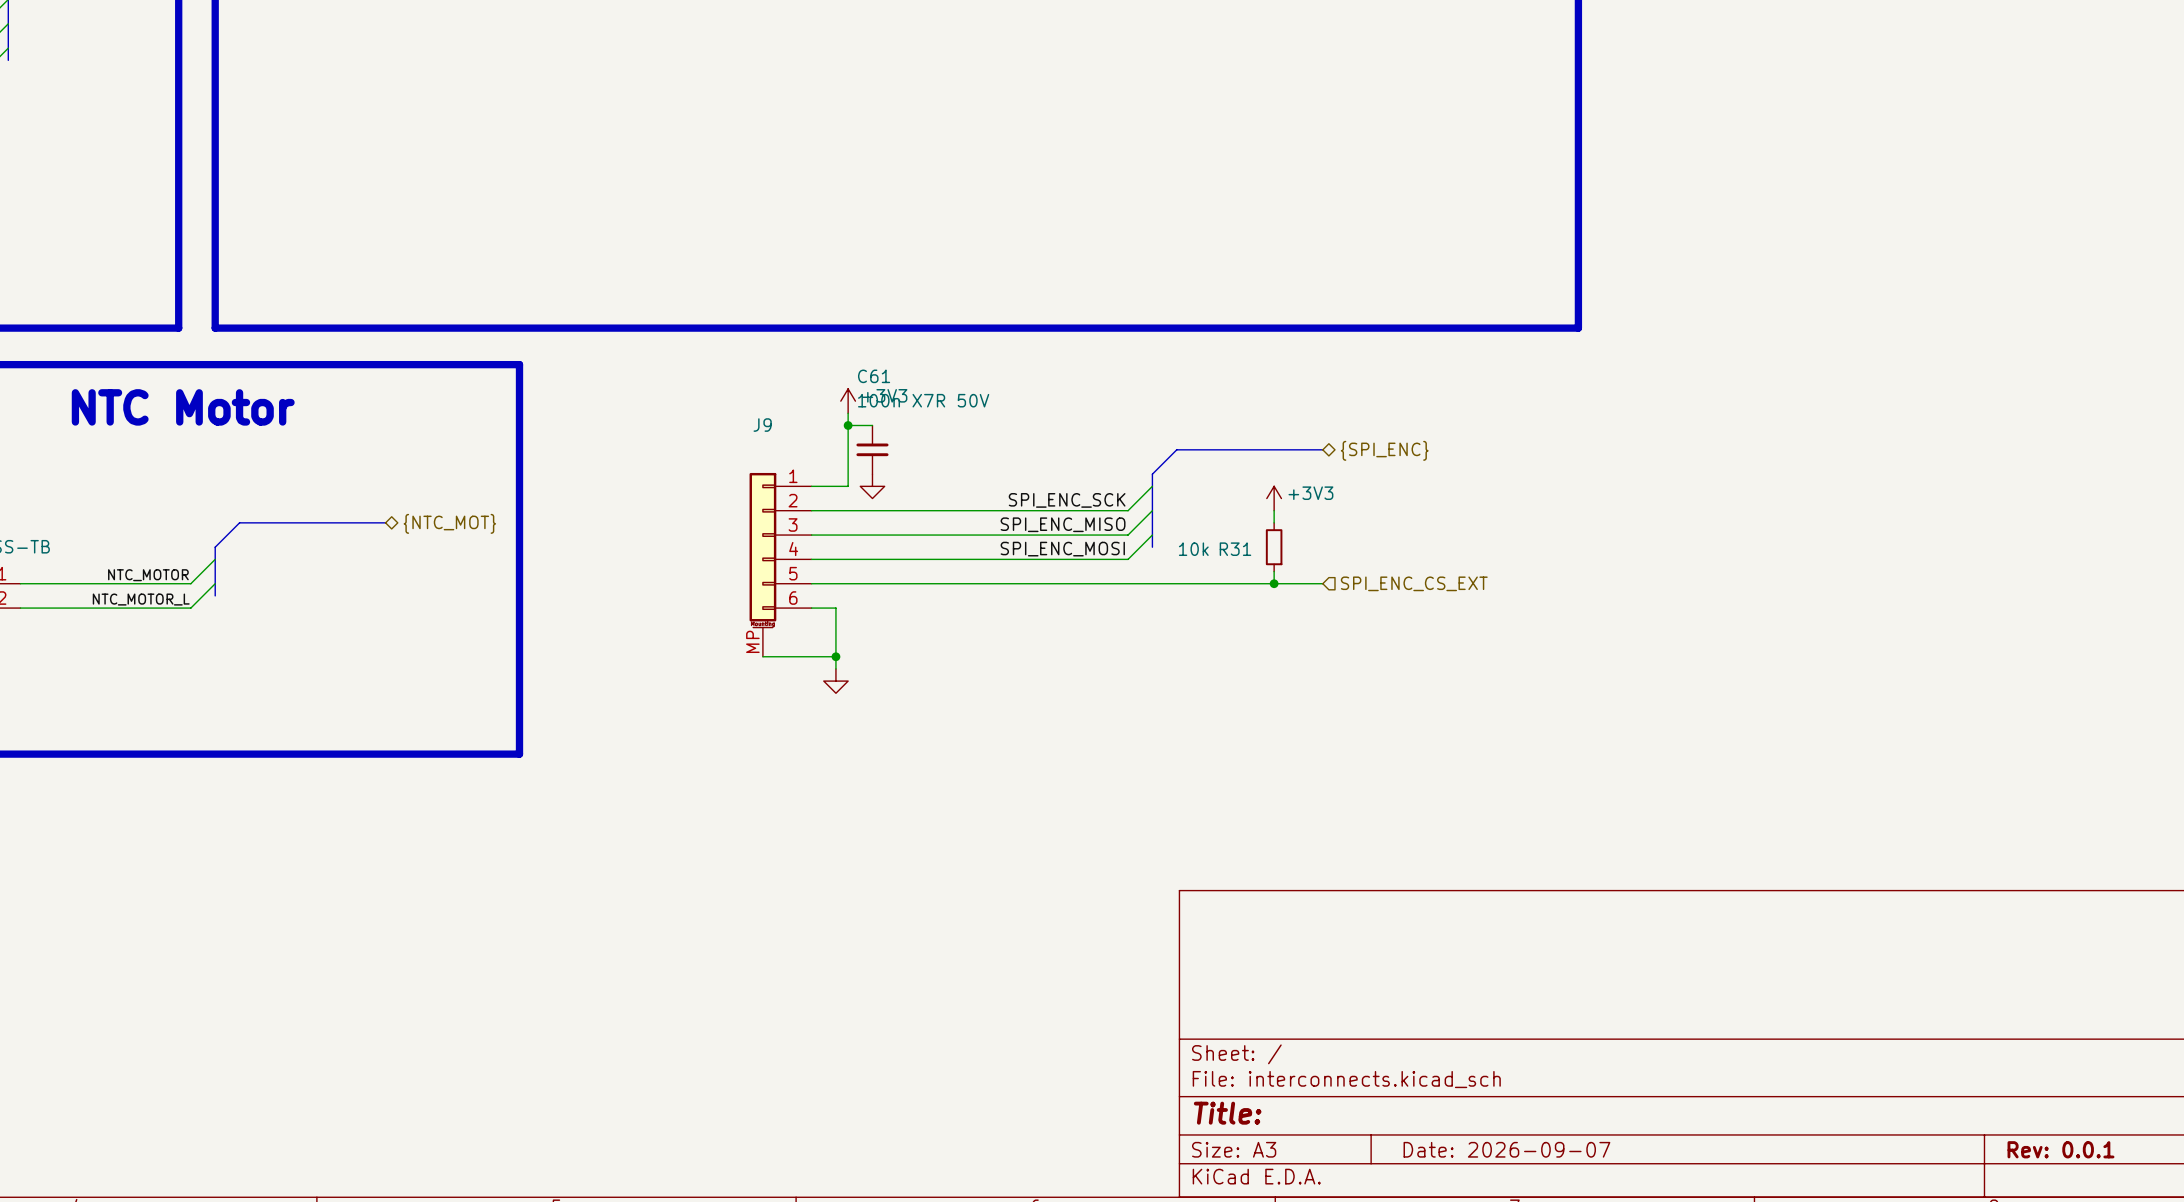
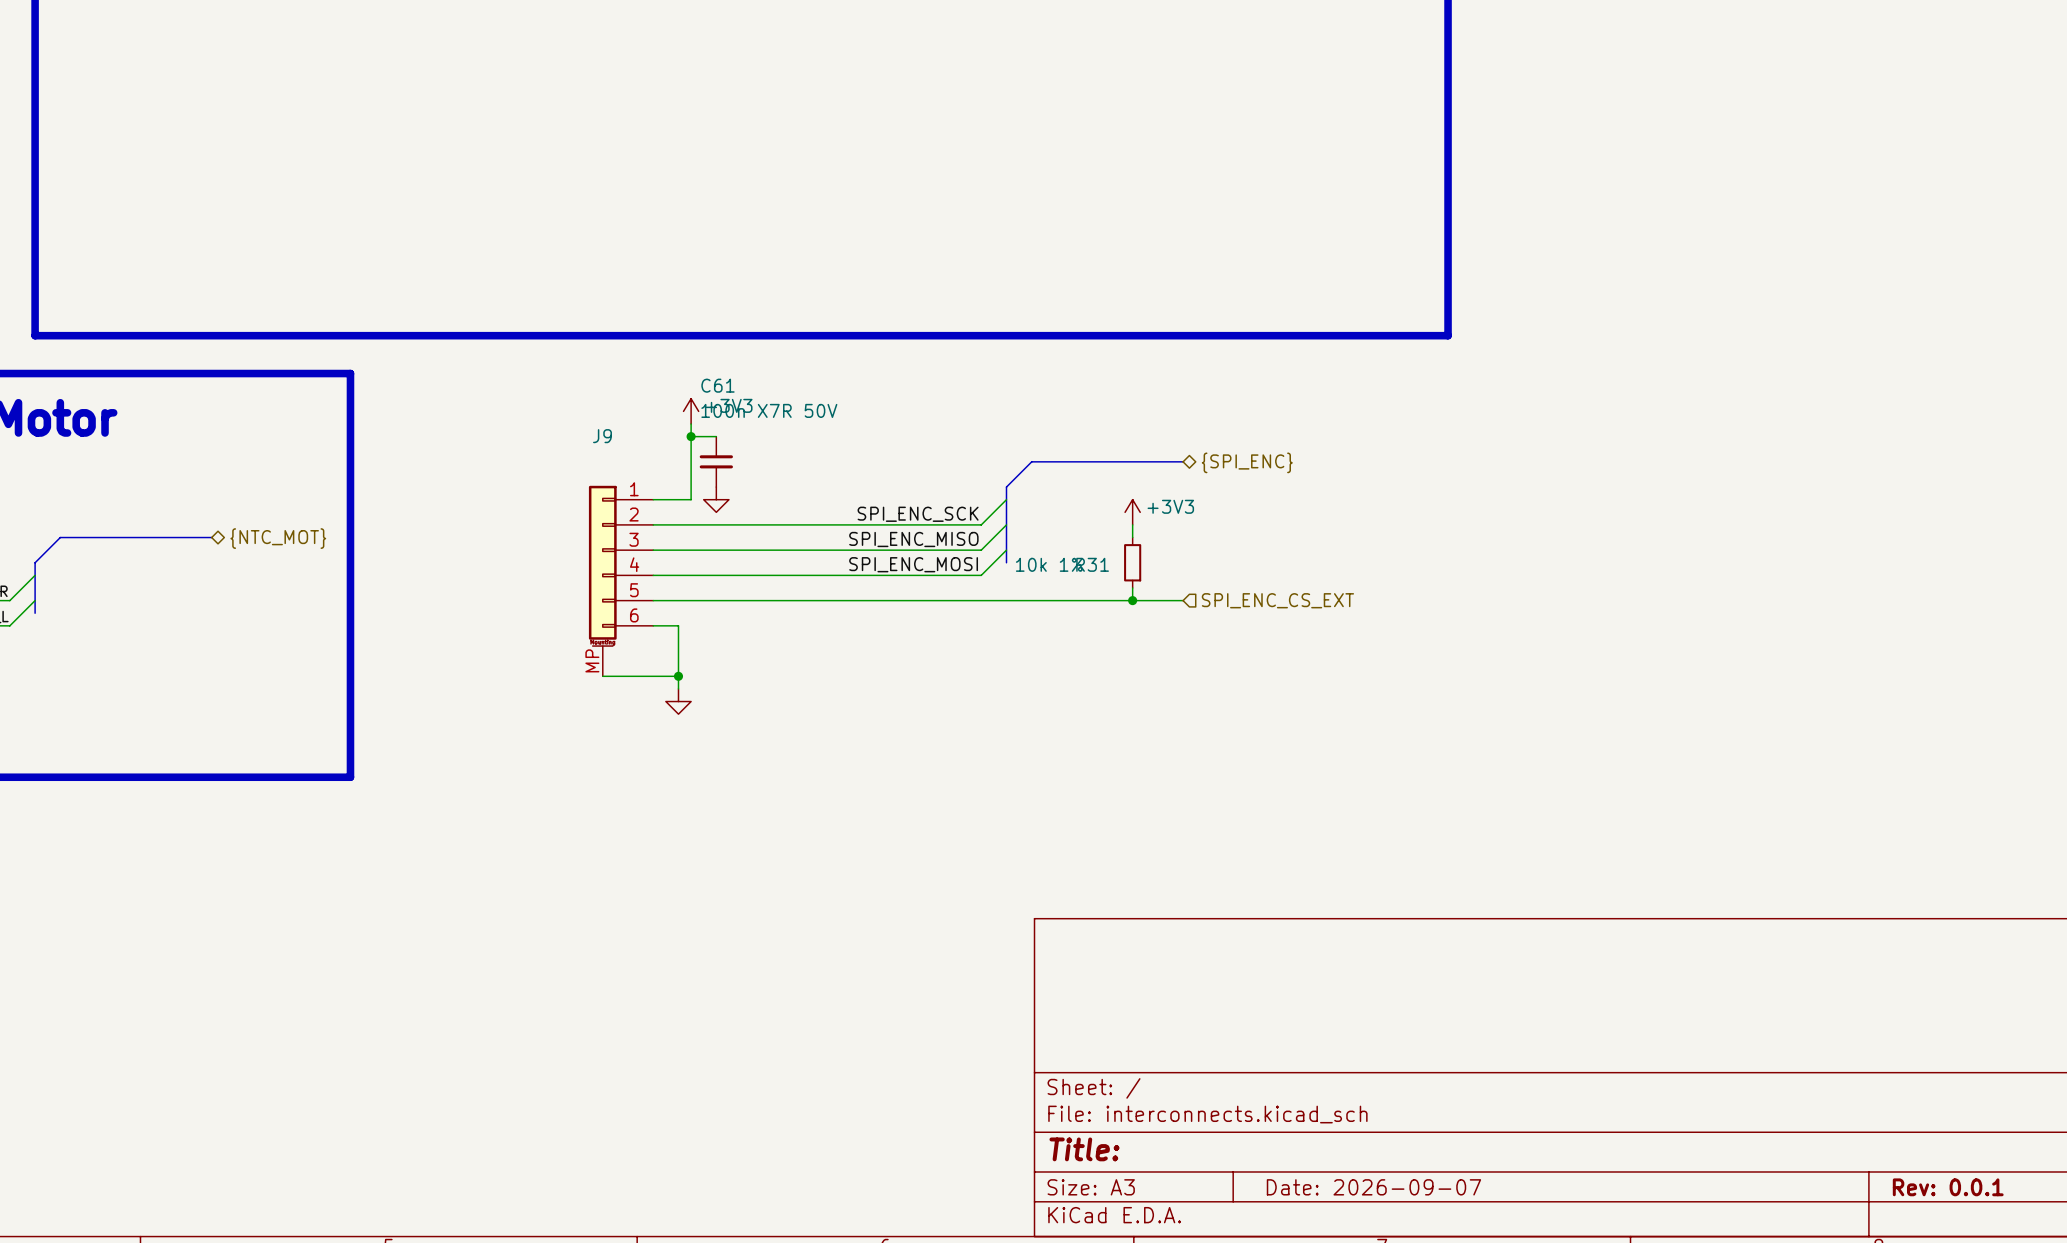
R31 value: 10k (1193, 549) -> 10k 1% (1049, 564)

